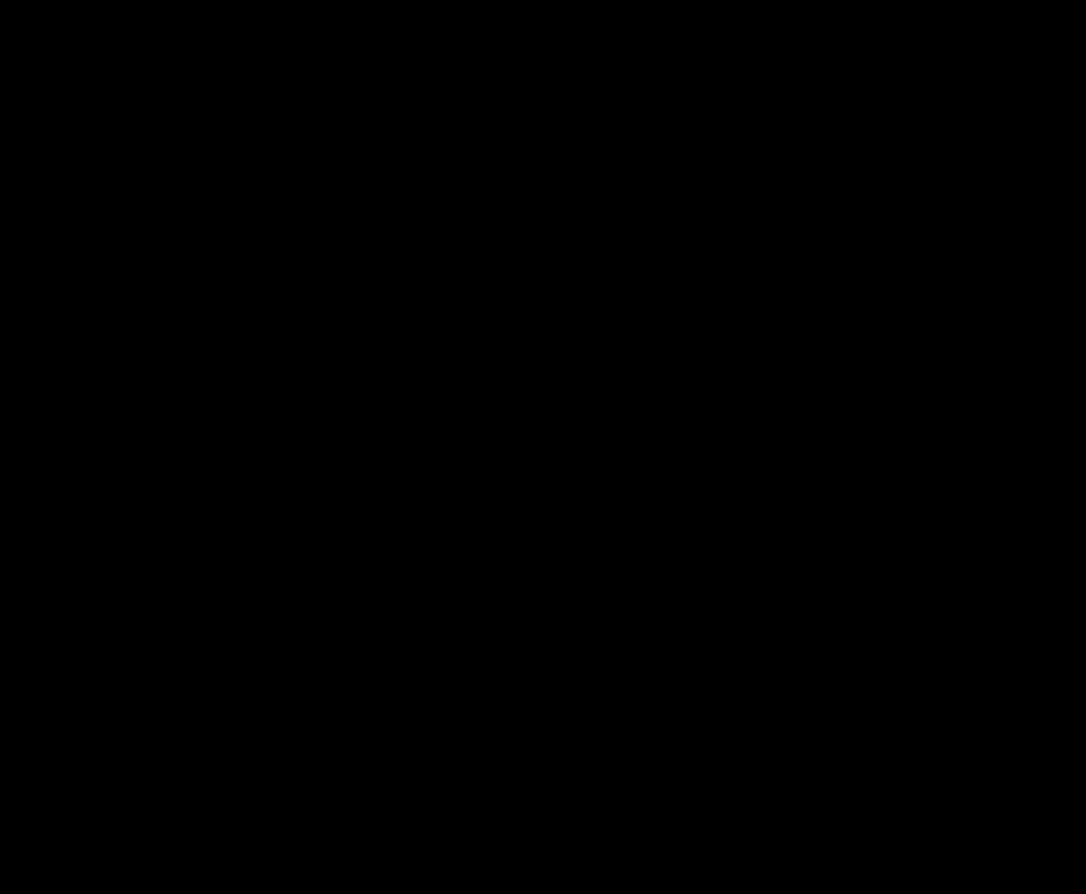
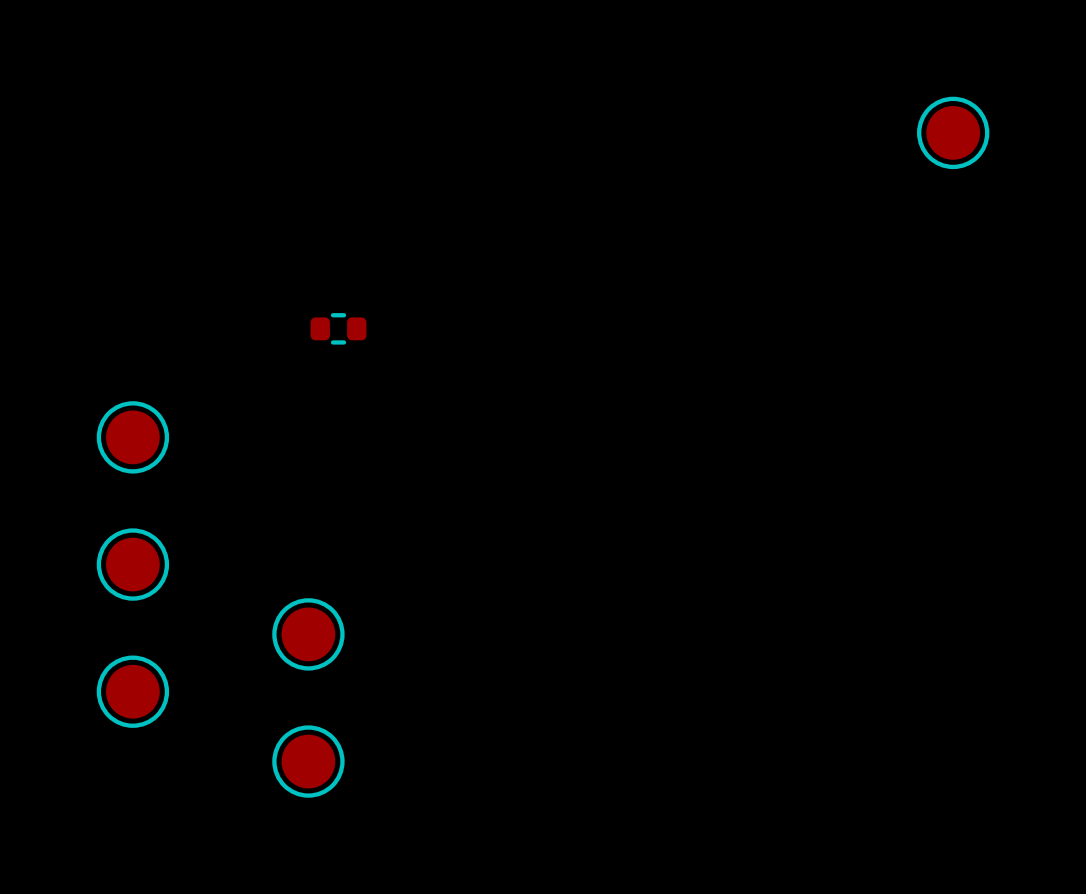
part: none -> (953, 132)
part: none -> (338, 328)
part: none -> (132, 437)
part: none -> (132, 564)
part: none -> (308, 634)
part: none -> (132, 691)
part: none -> (308, 761)

